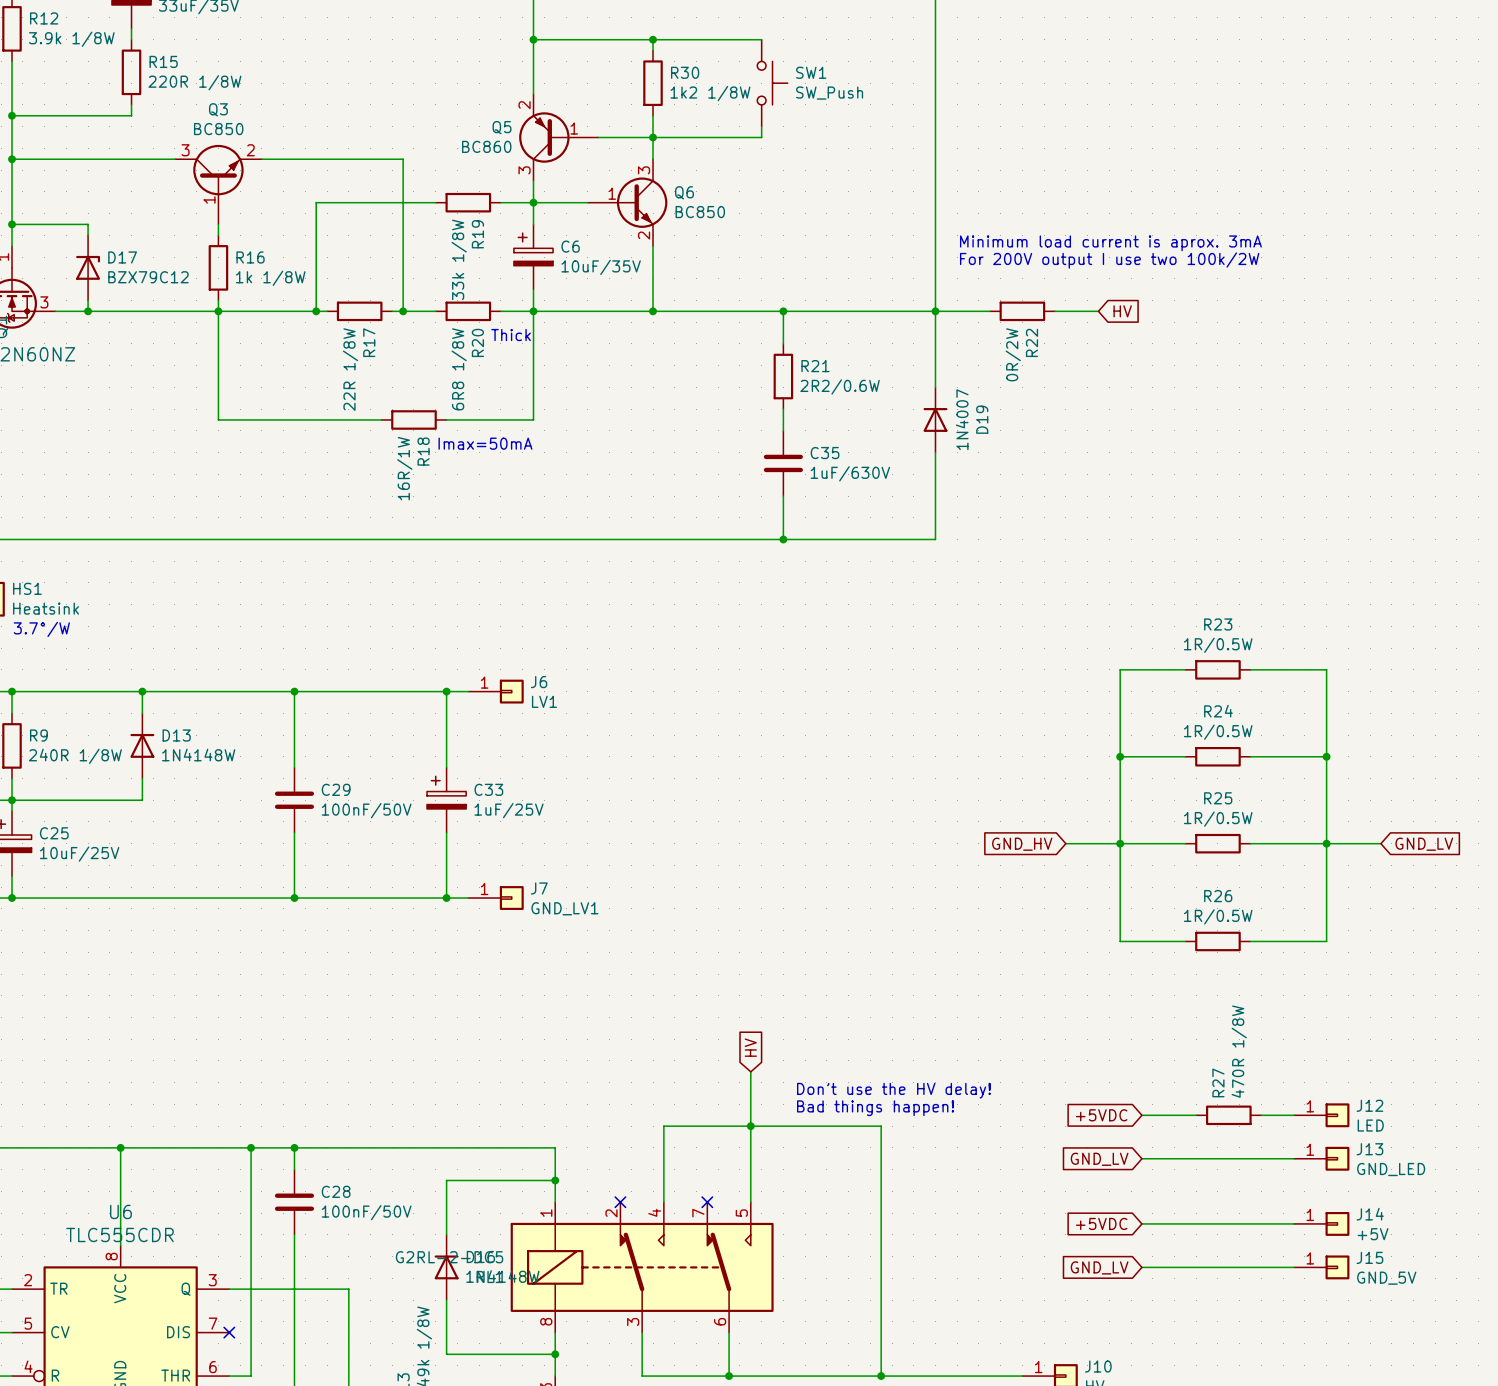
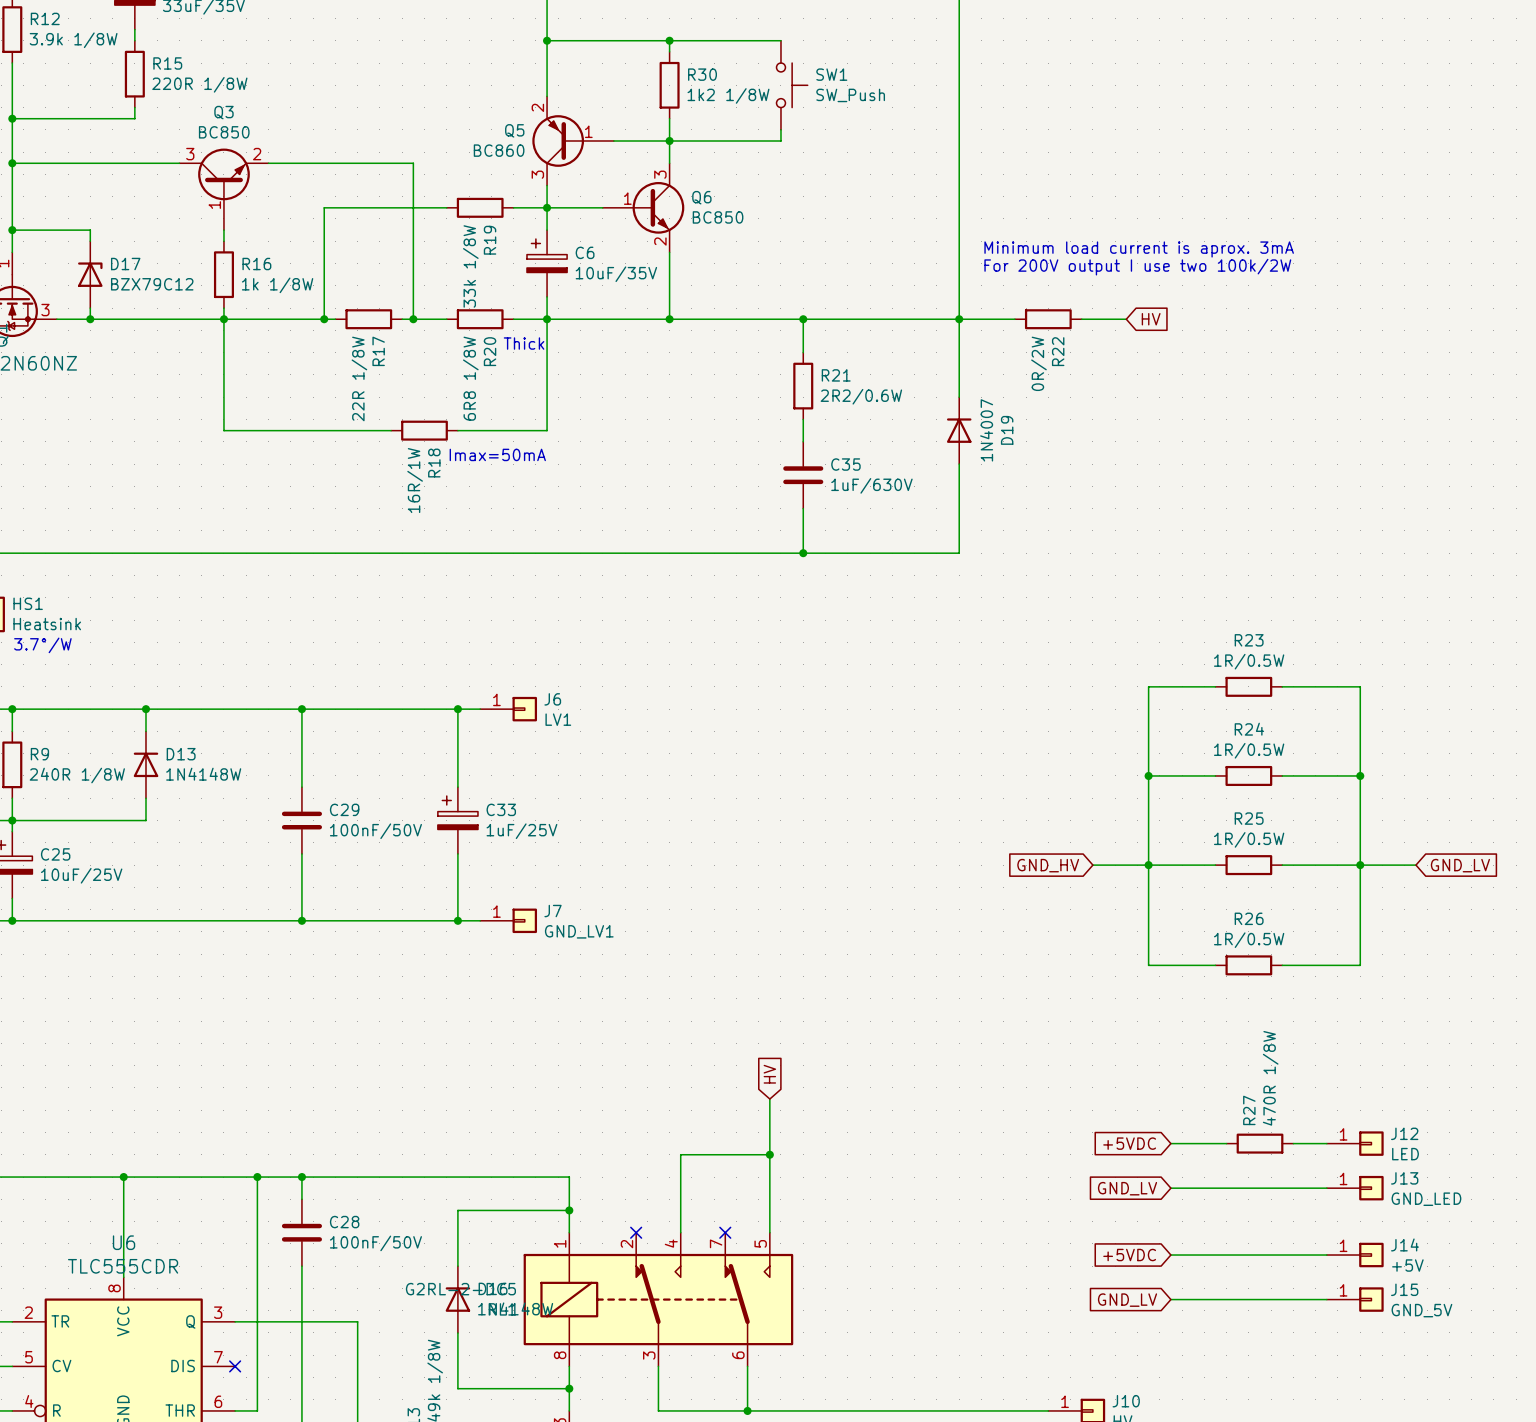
text: Don’t use the HV delay! (893, 1090) -> none
text: Bad things happen! (875, 1108) -> none
wire: (750, 1126) (881, 1126) (881, 1376) -> none
junction: (881, 1376) -> none

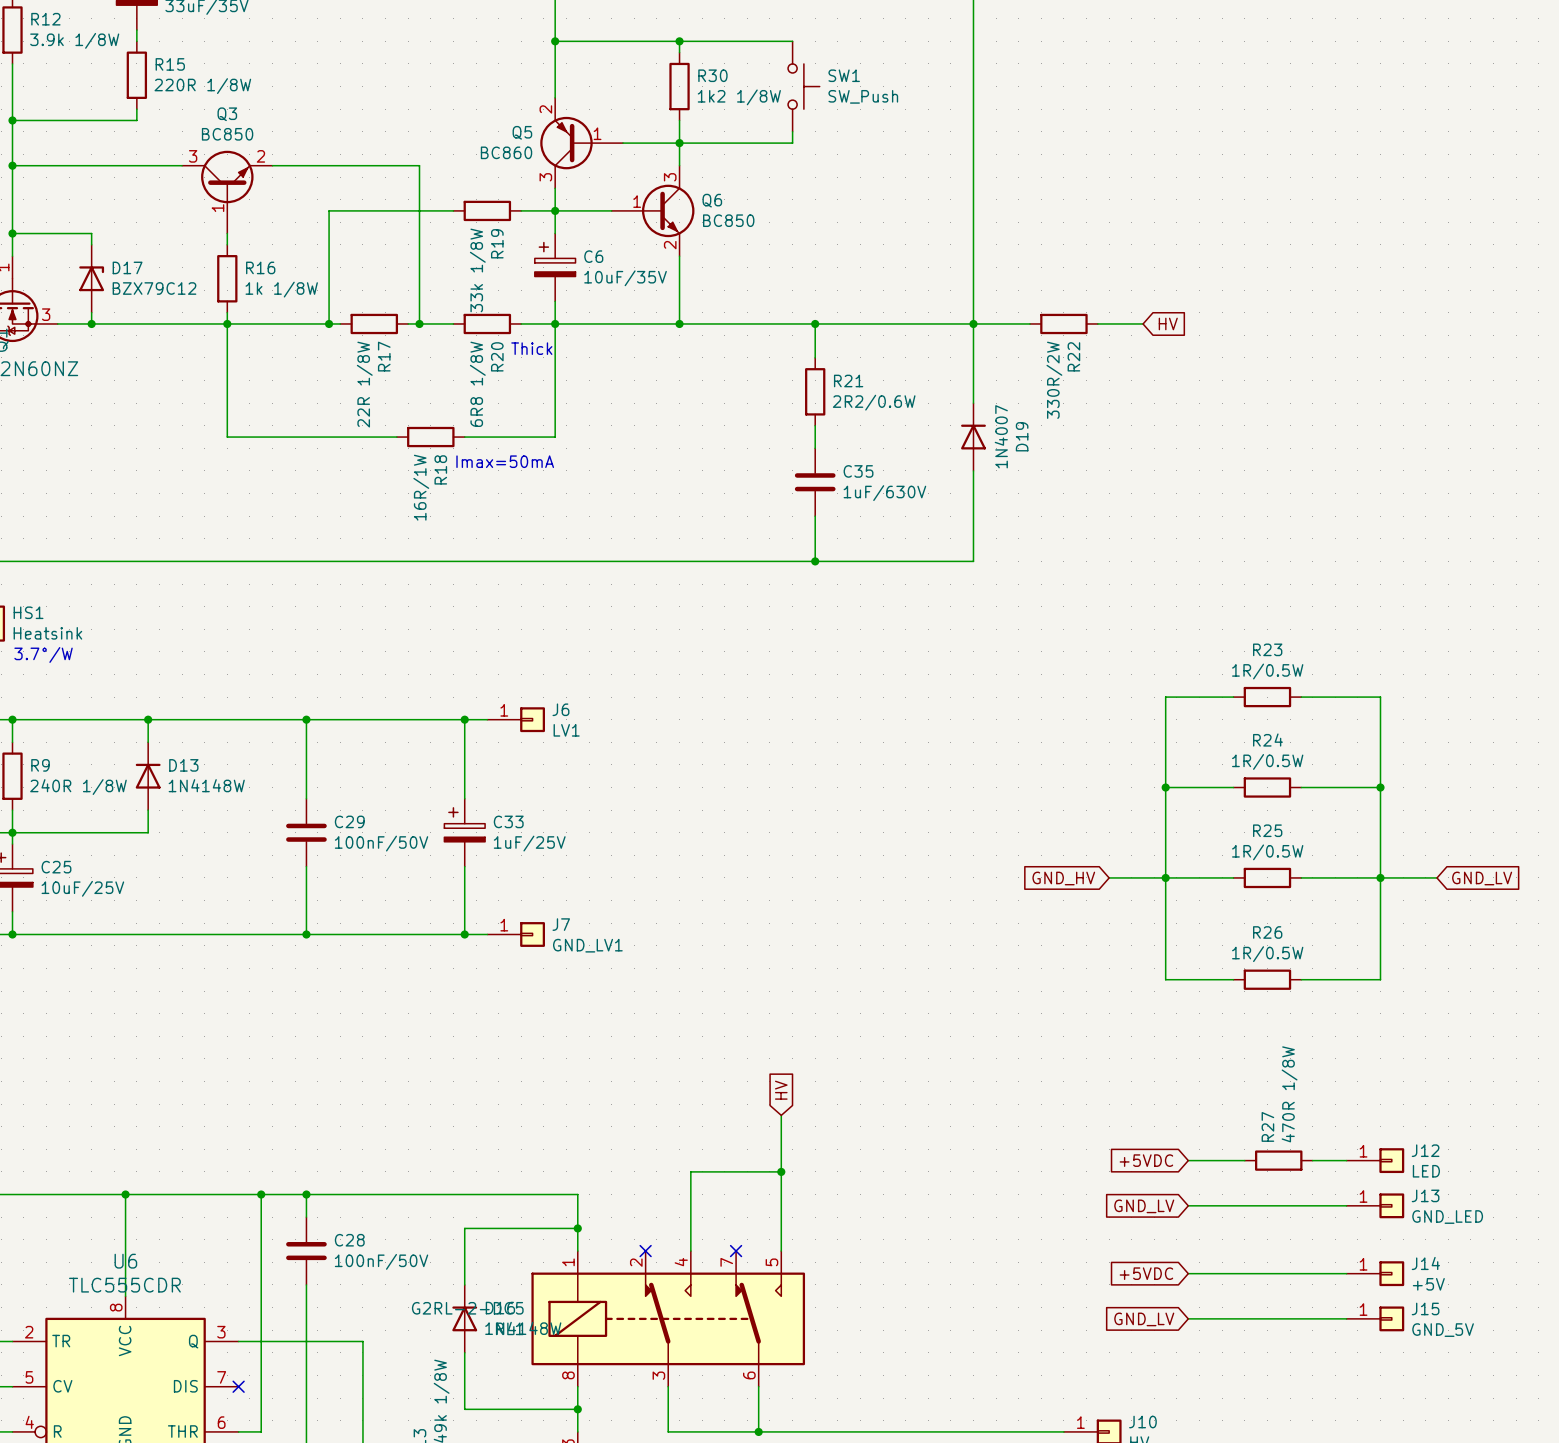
text: Minimum load current is aprox. 3mA (1139, 249) -> none
text: For 200V output I use two 100k/2W (1137, 267) -> none
R22 value: 0R/2W (1038, 363) -> 330R/2W (1054, 380)

